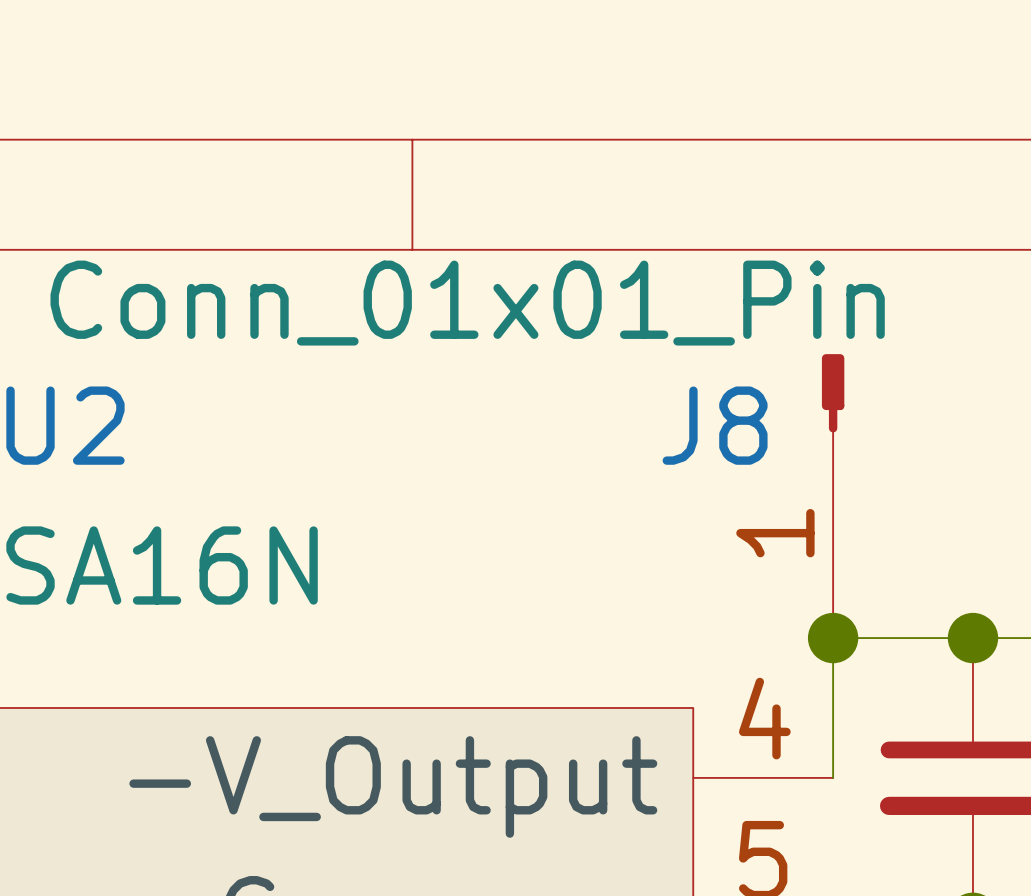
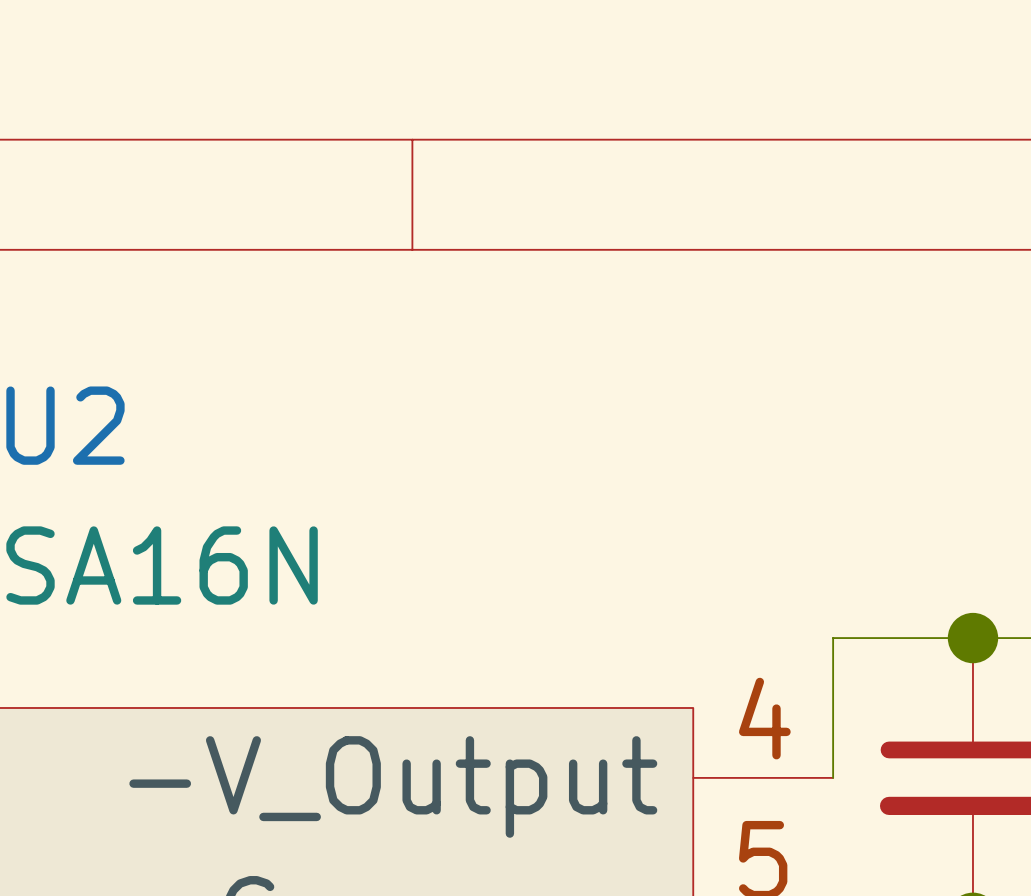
J8: Conn_01x01_Pin (833, 496) -> none
junction: (833, 638) -> none

